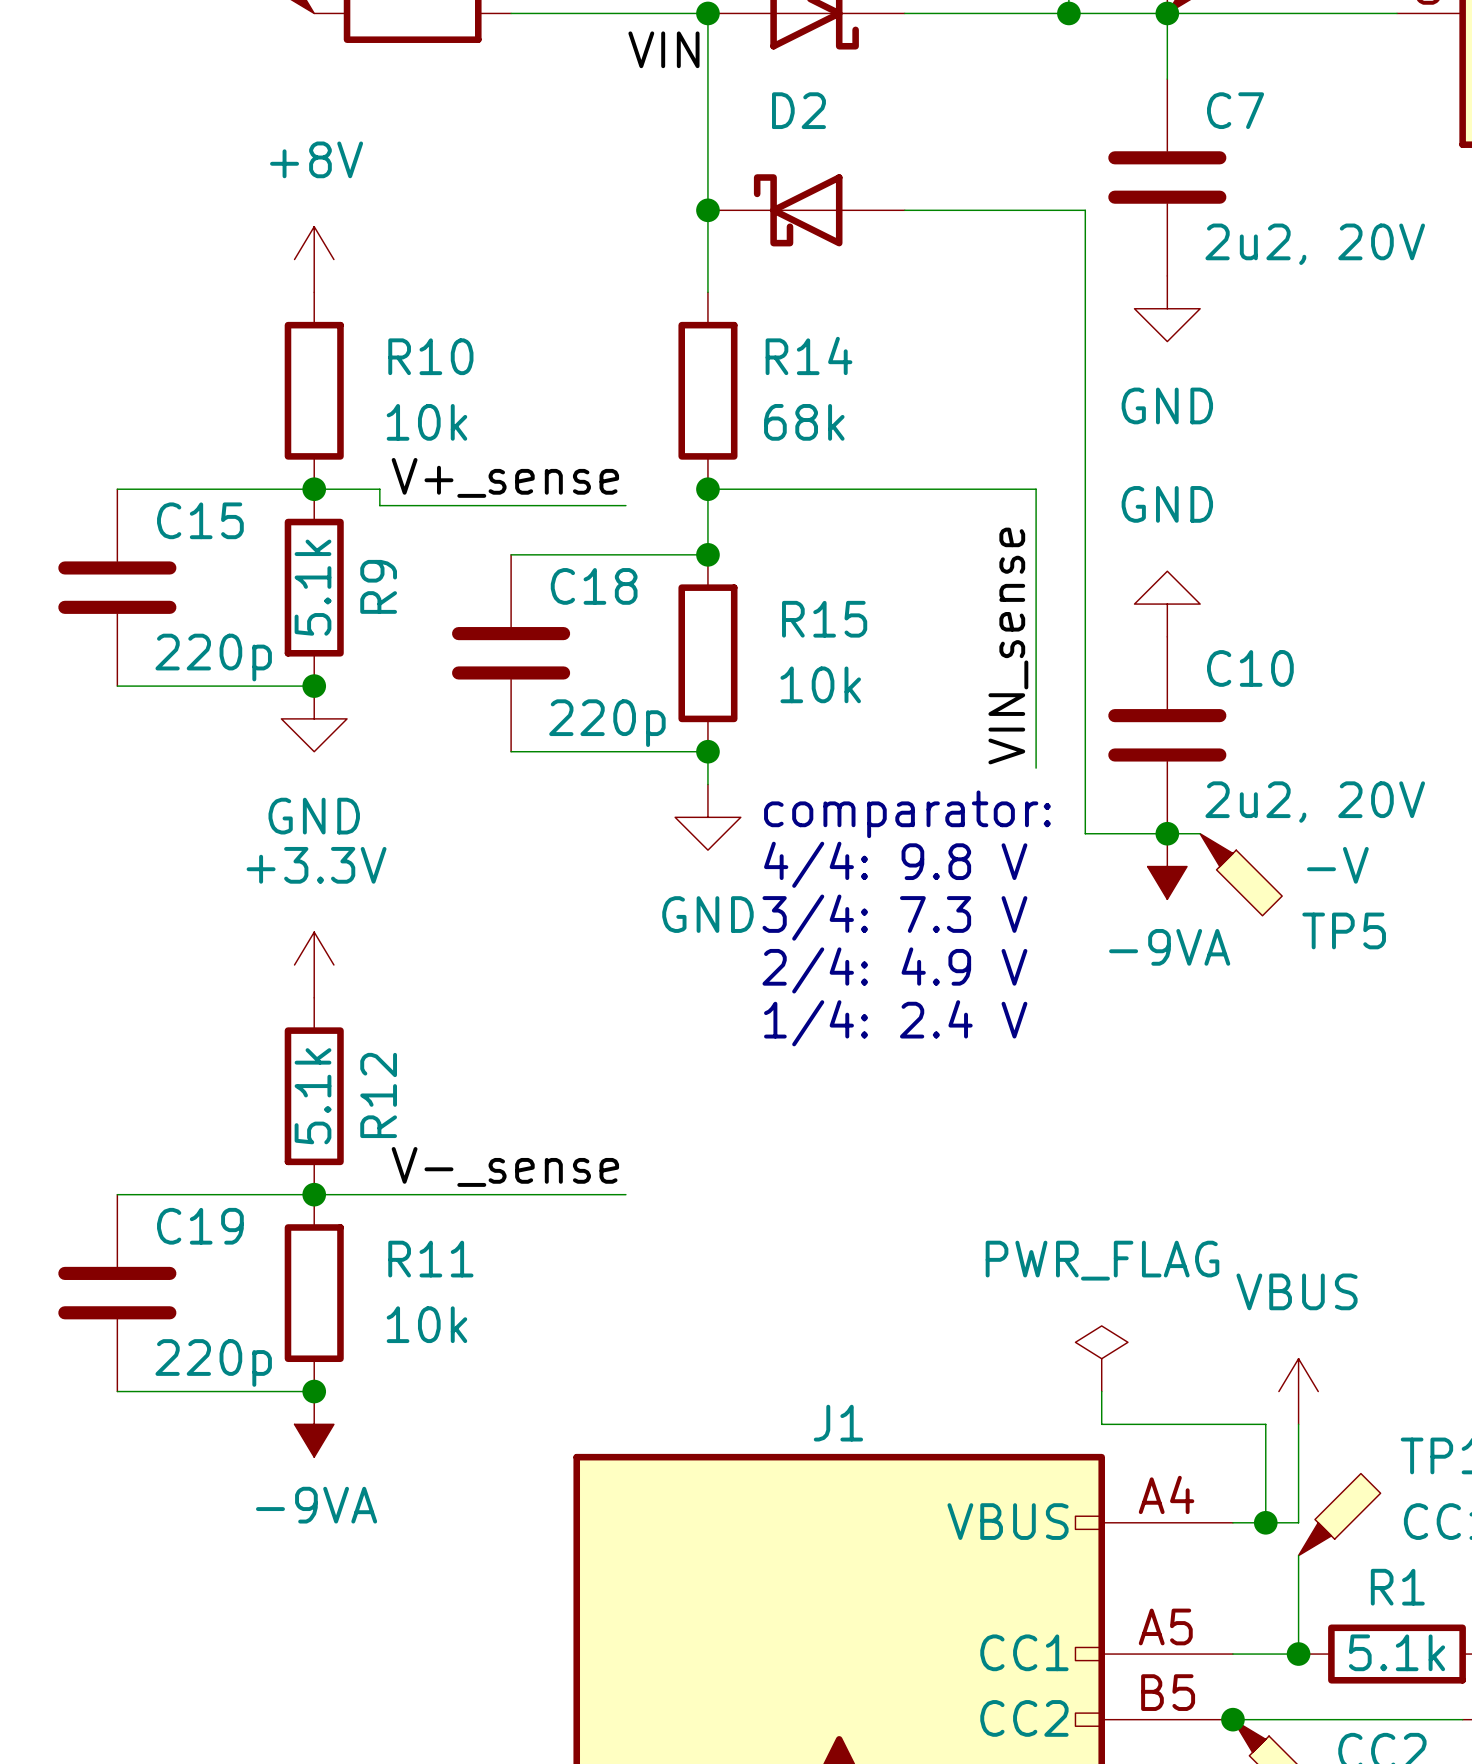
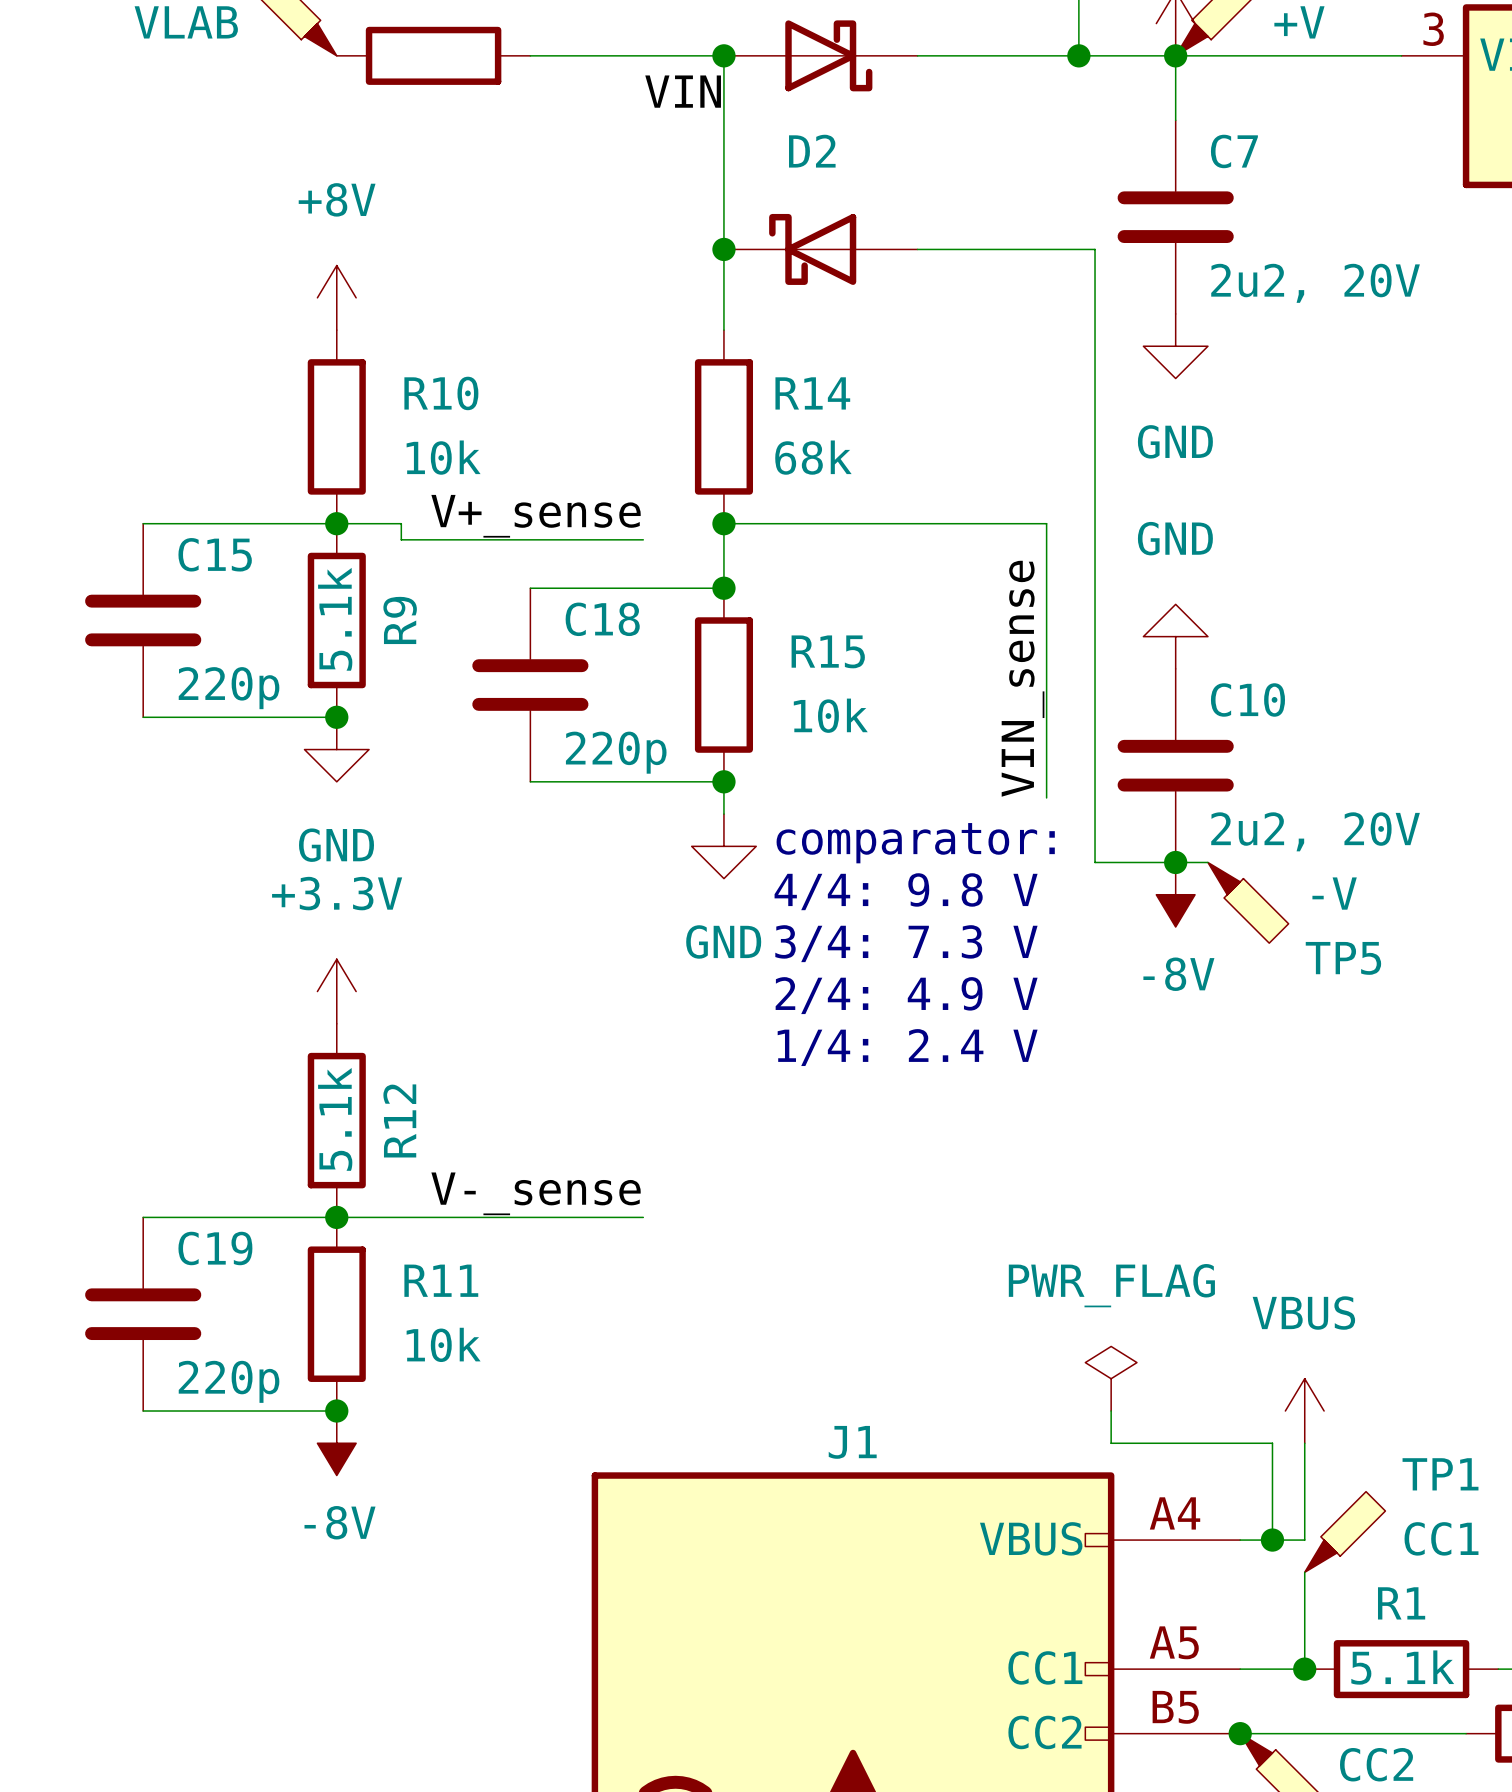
power symbol: -9VA (1167, 866) -> -8V (1175, 894)
power symbol: -9VA (314, 1424) -> -8V (336, 1443)

